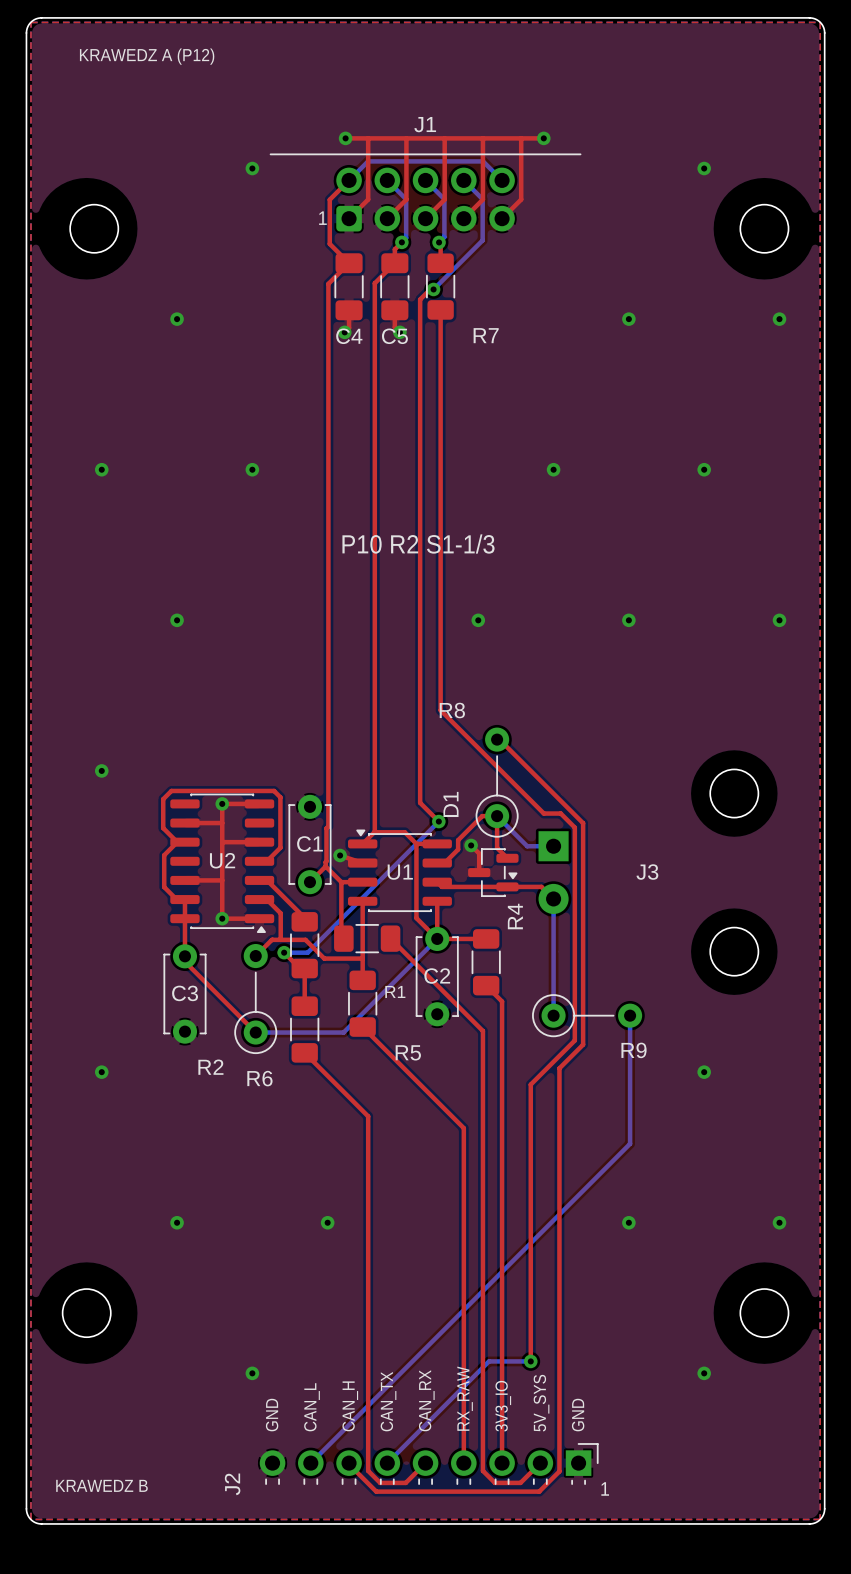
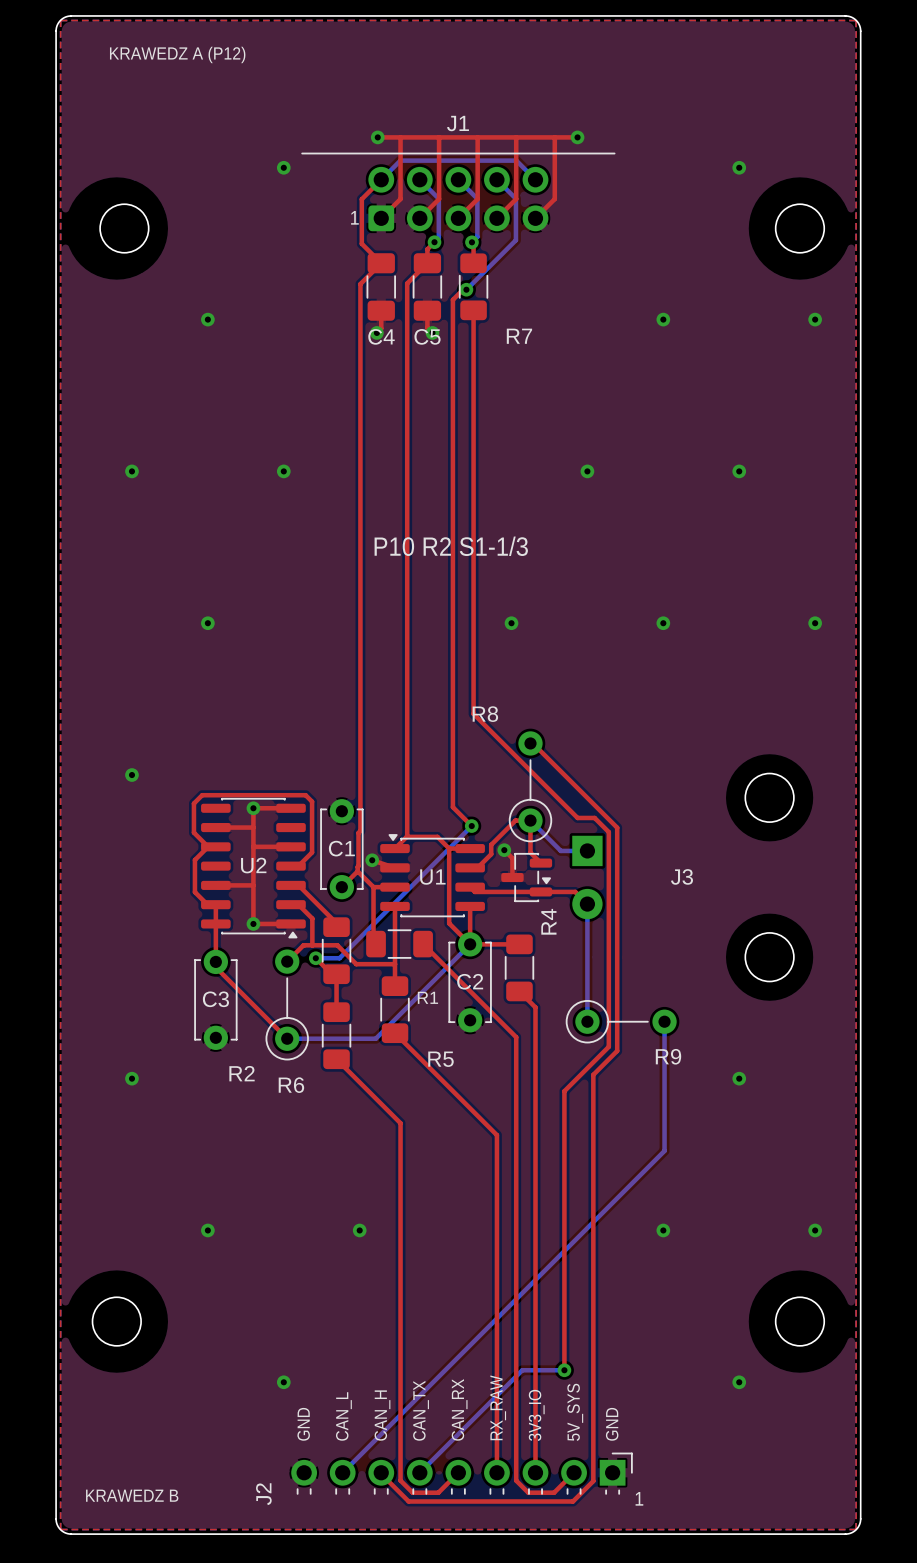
D1 name: D1 (450, 804) -> none

